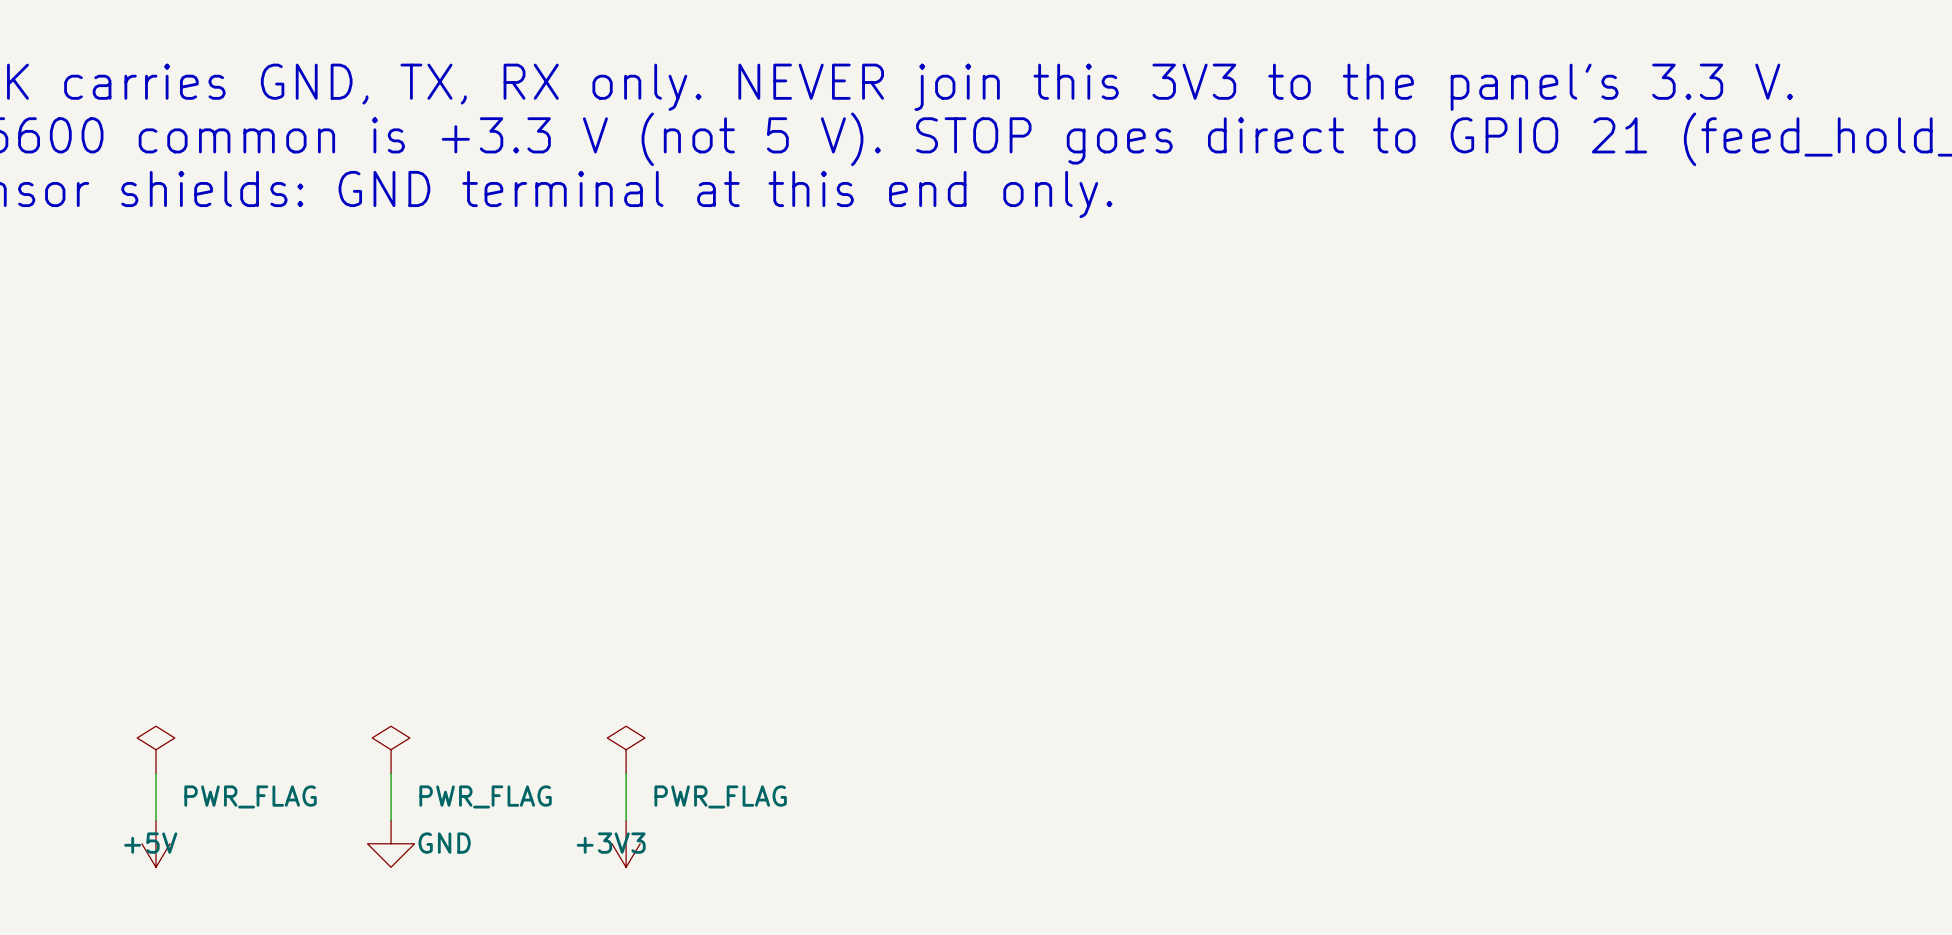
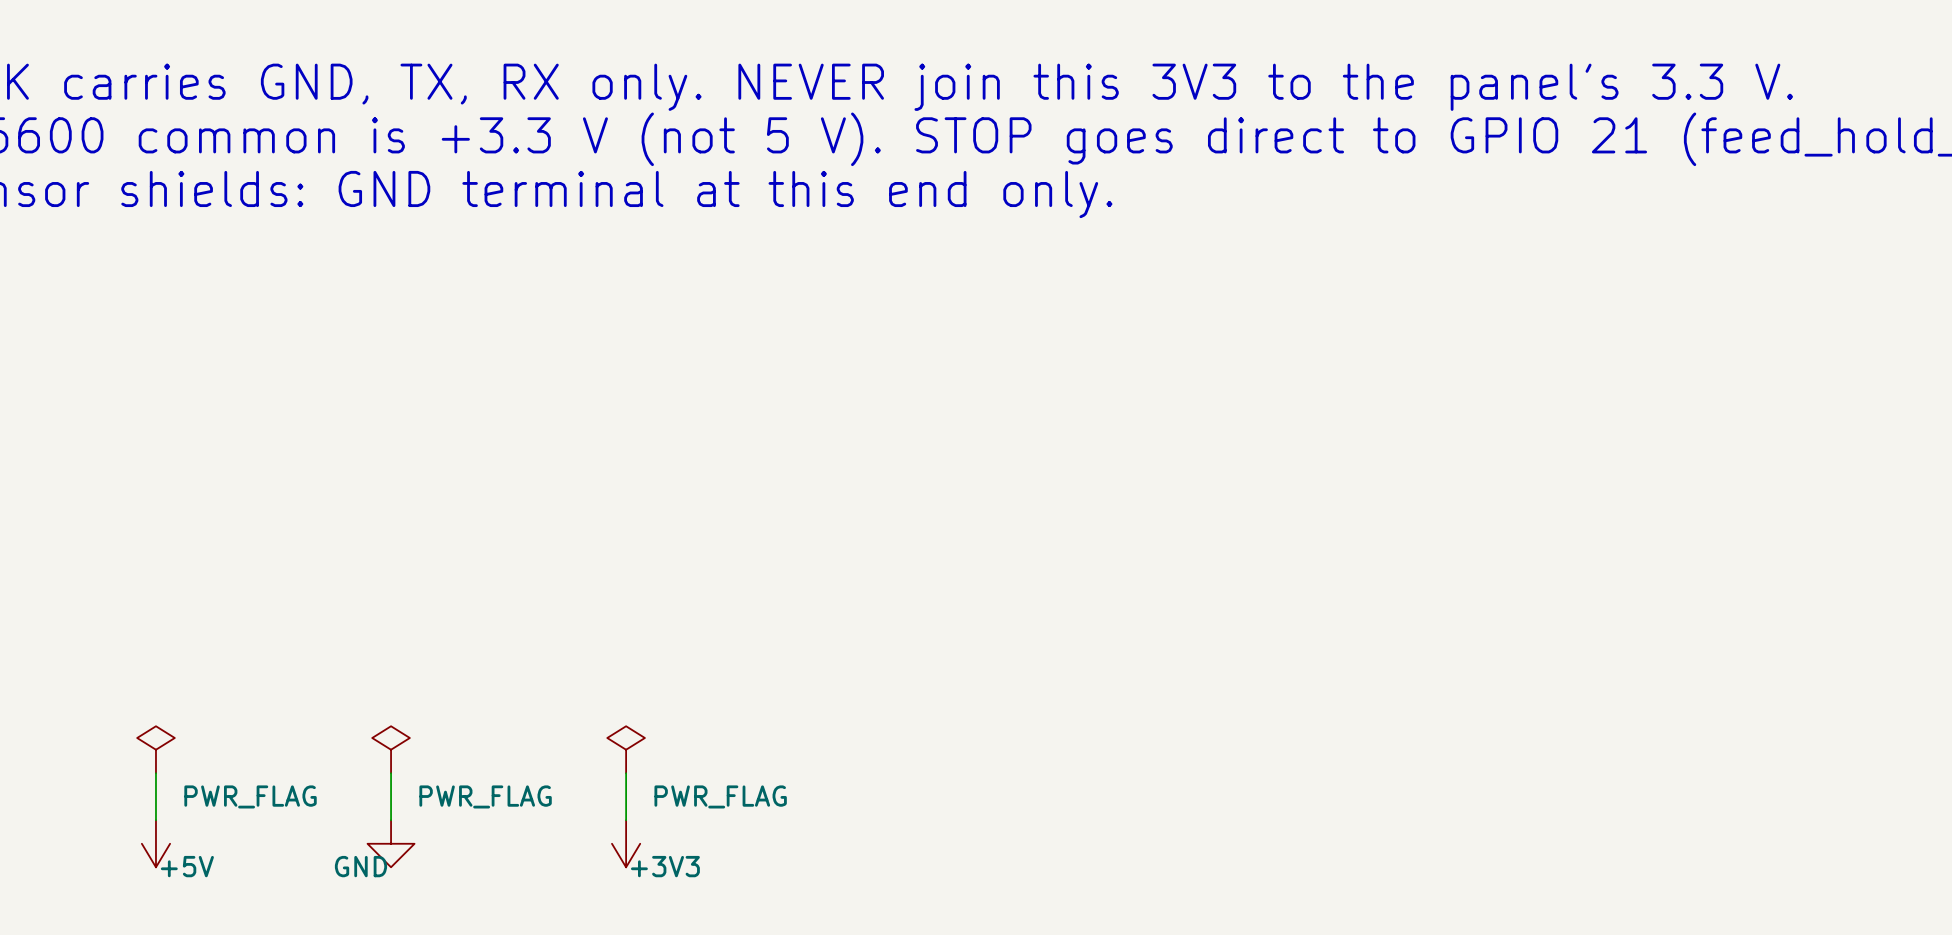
power symbol text position: +5V (150, 843) -> +5V (187, 866)
power symbol text position: GND (444, 843) -> GND (360, 866)
power symbol text position: +3V3 (611, 843) -> +3V3 (665, 866)

